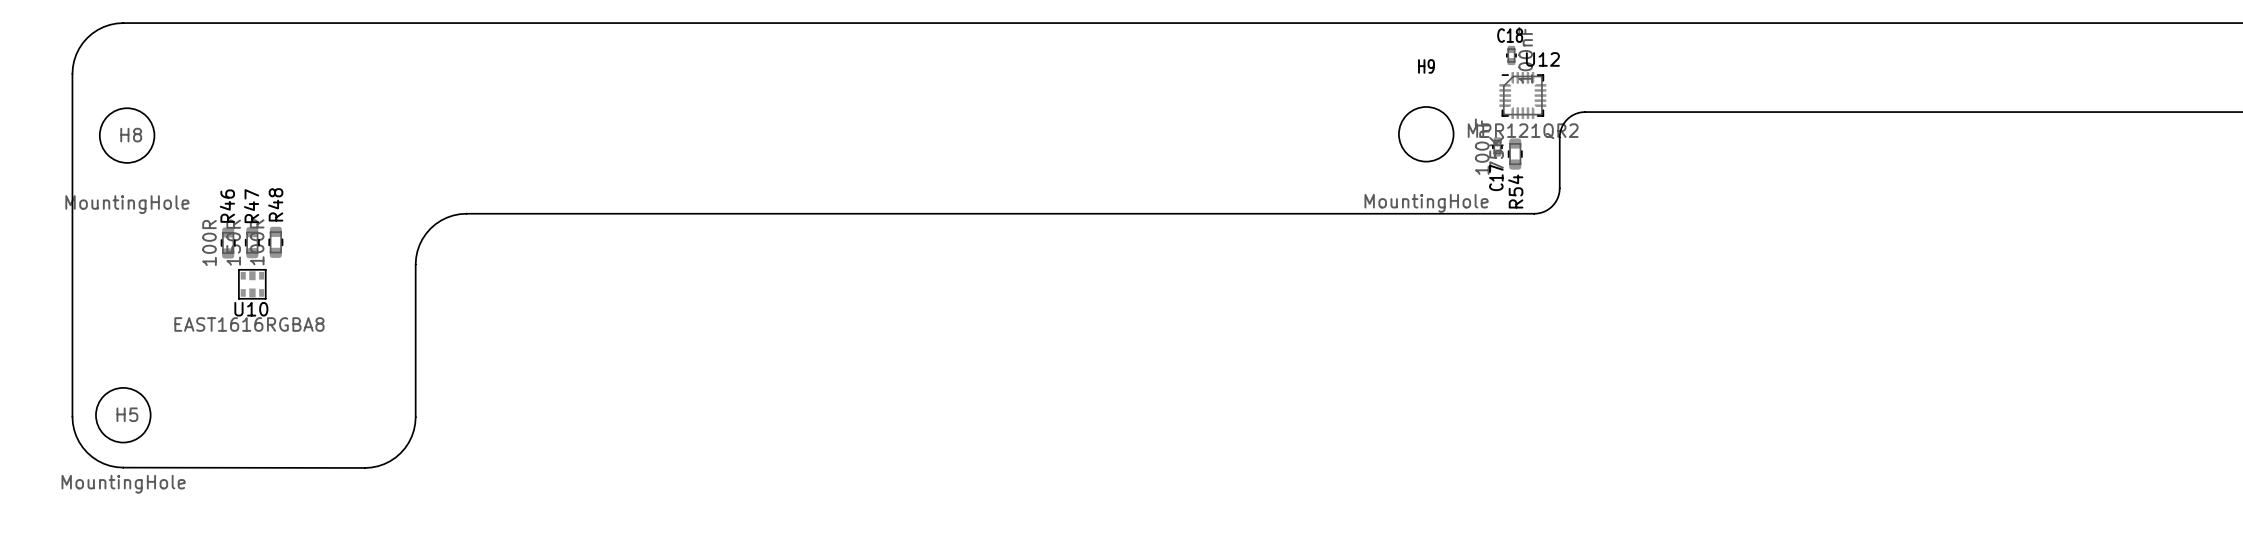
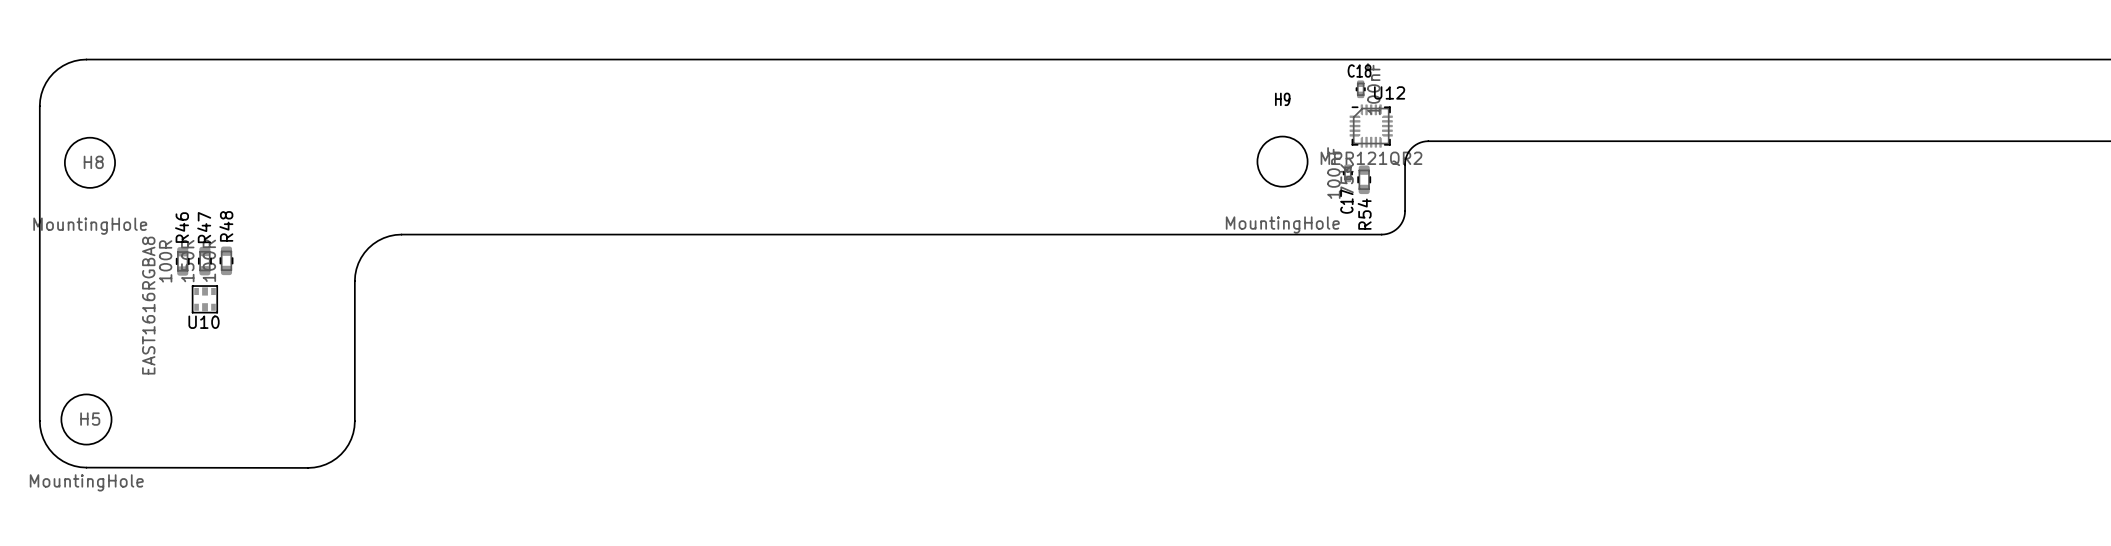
U10 value rotation: 0° (249, 324) -> 90° counterclockwise (148, 305)

